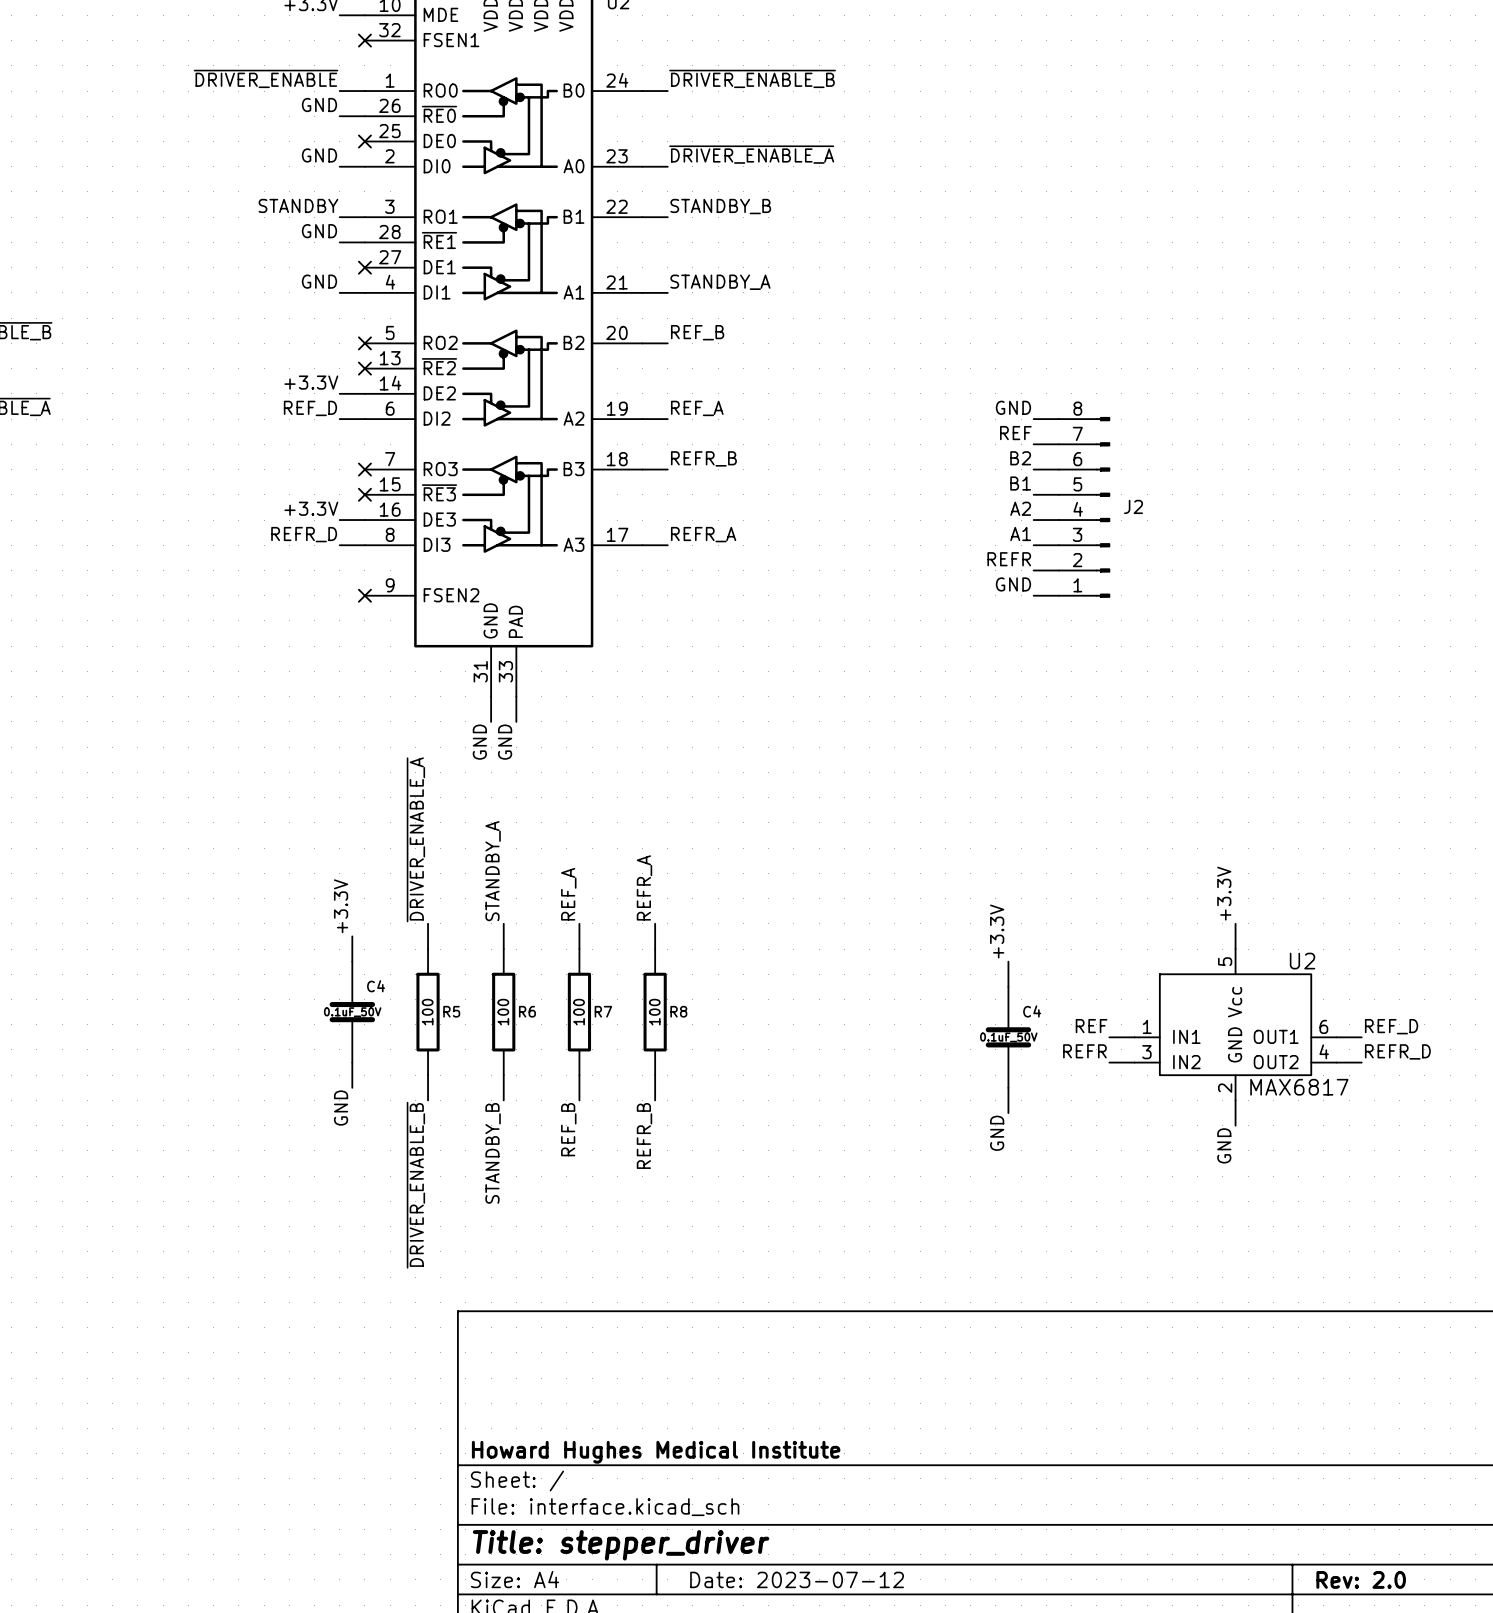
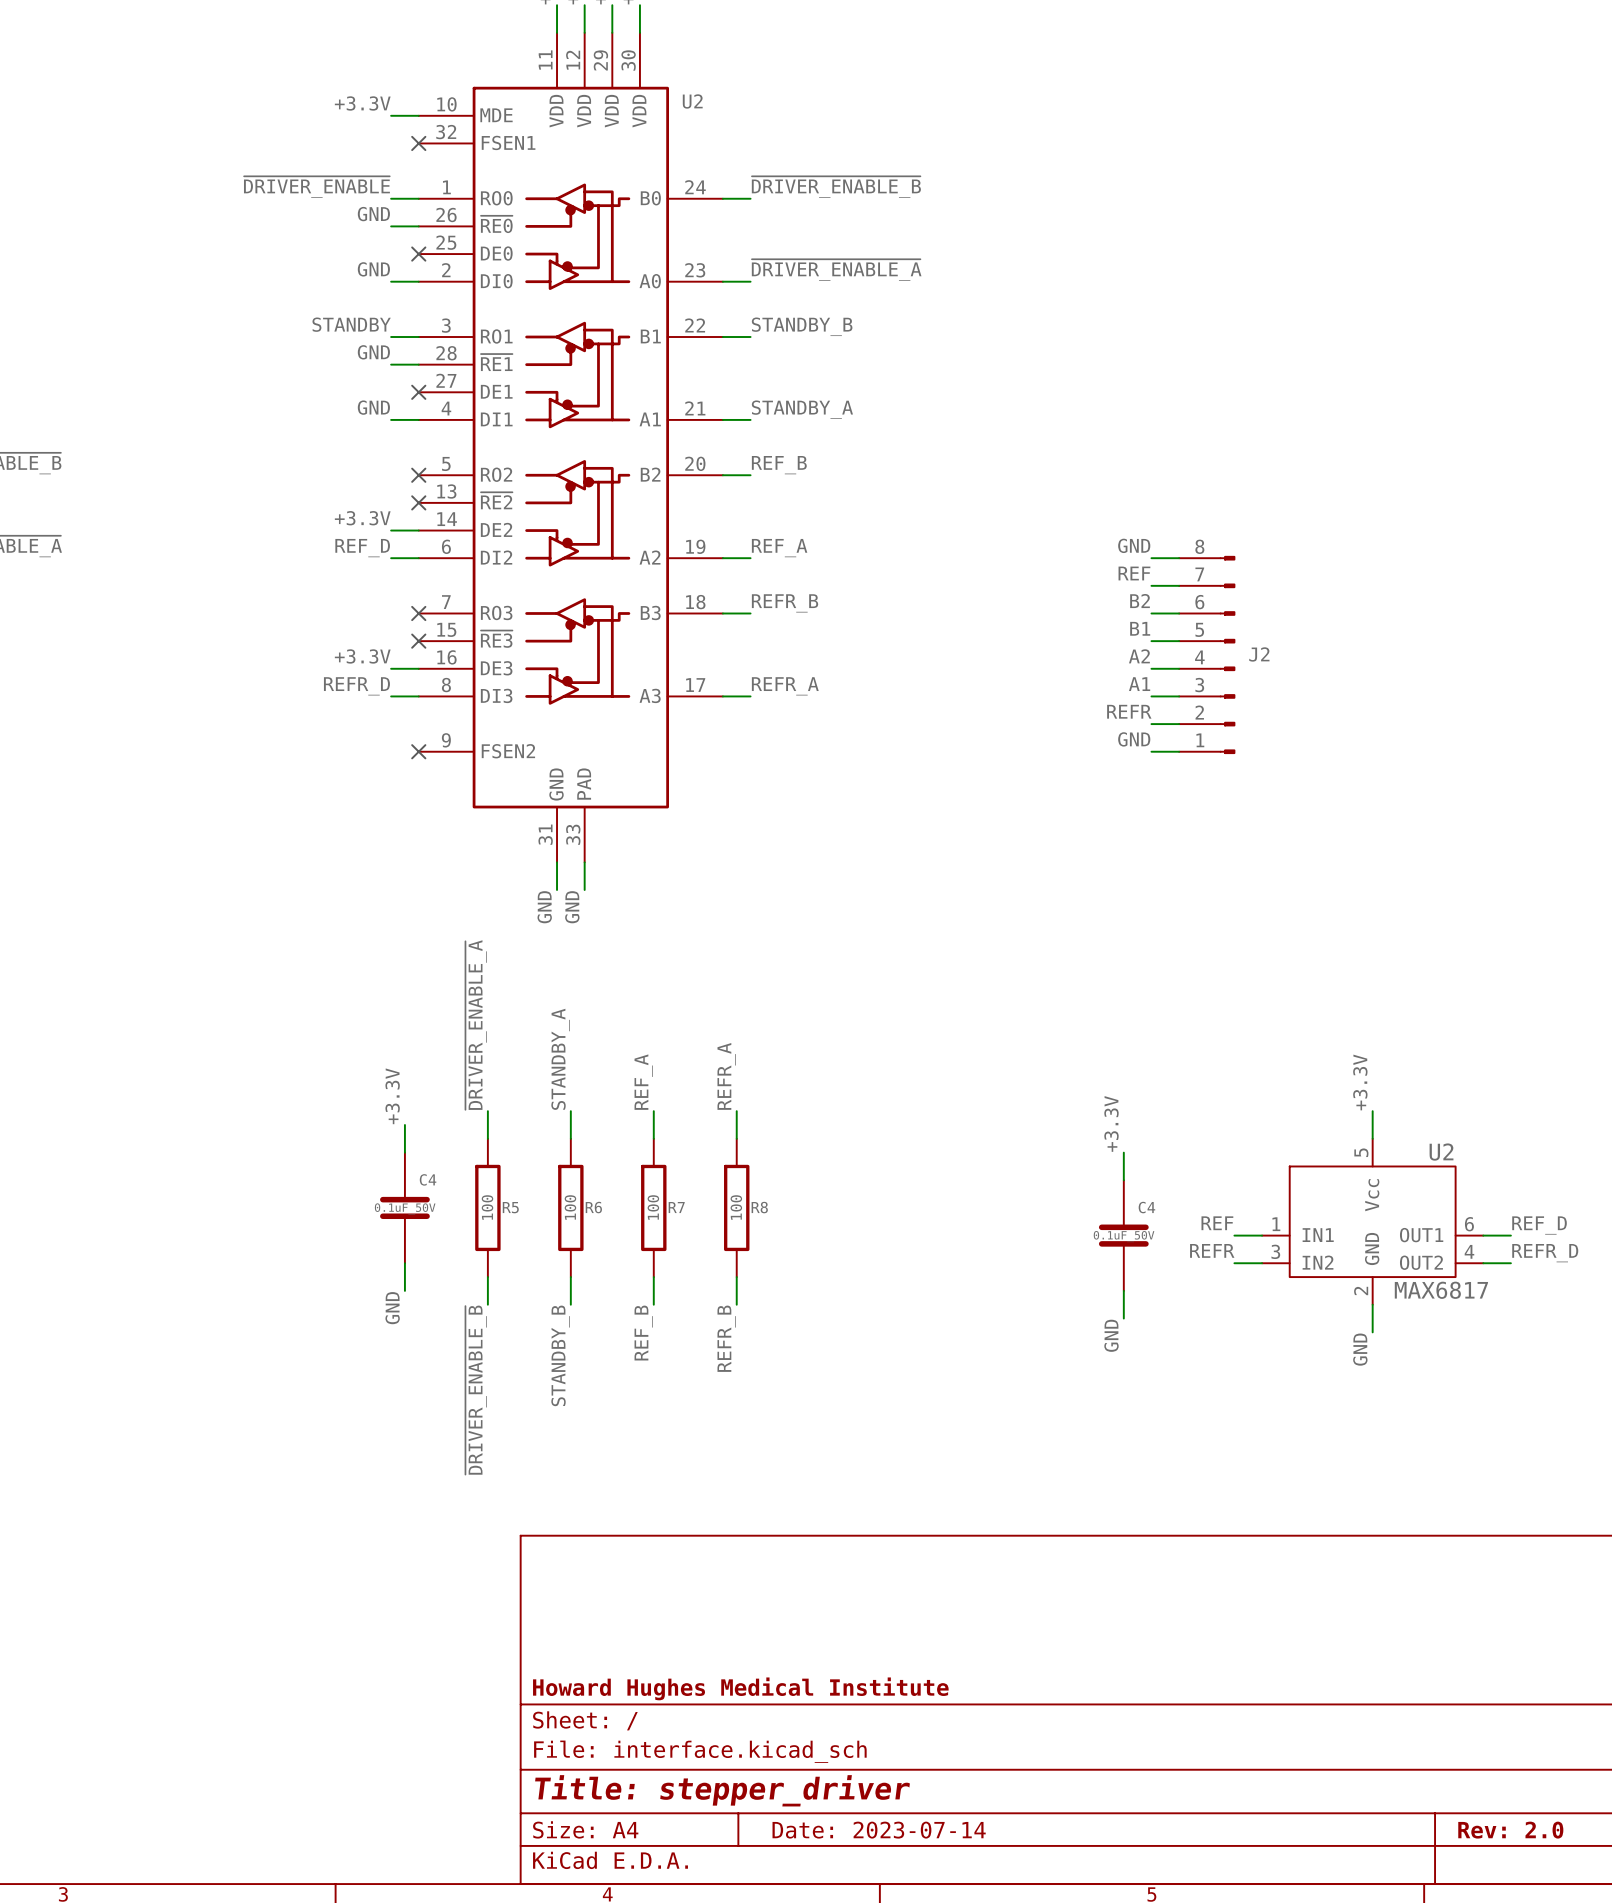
title block: Date: 2023-07-12 (797, 1579) -> Date: 2023-07-14 (879, 1830)

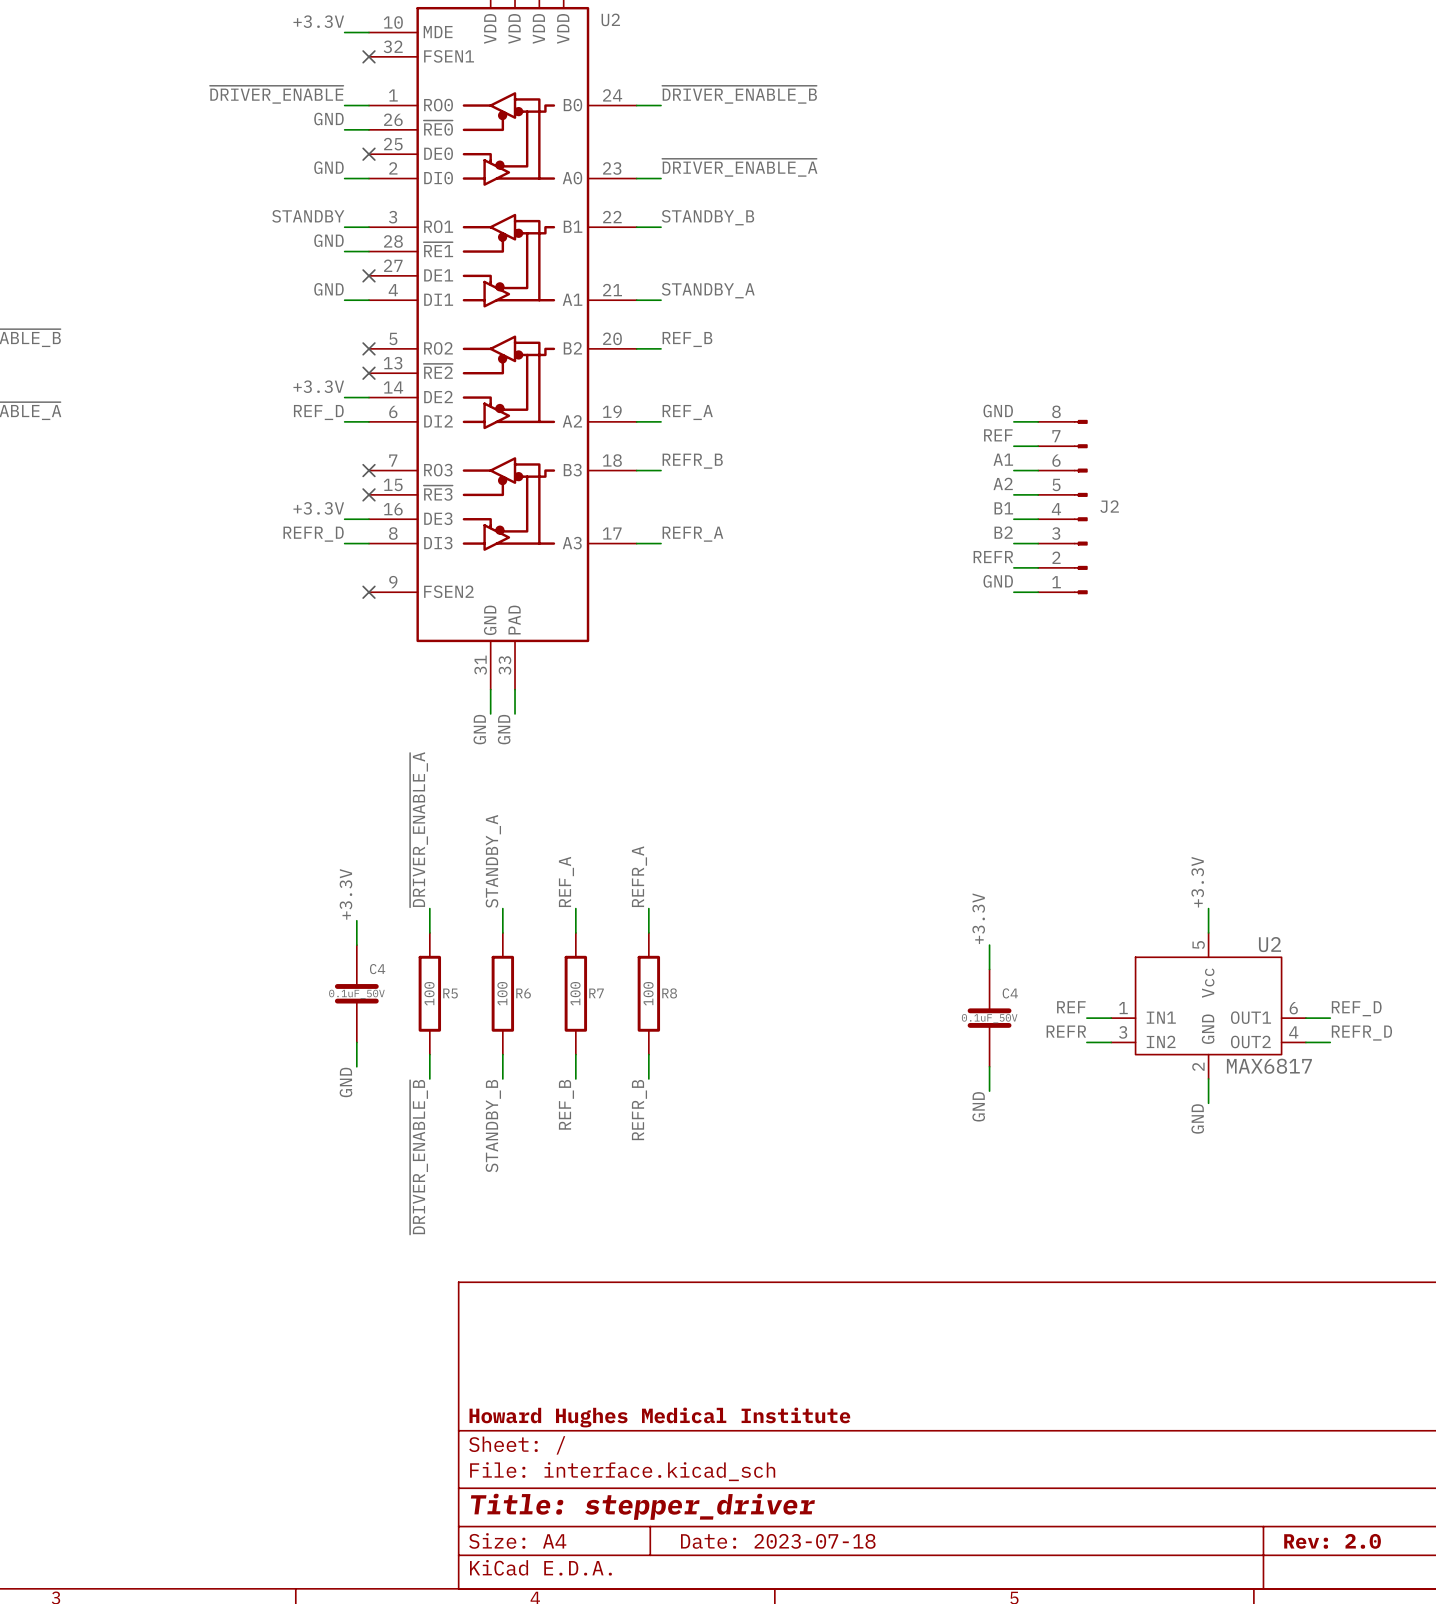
label: B2 (1140, 601) -> A1 (1003, 459)
label: B1 (1140, 628) -> A2 (1003, 483)
label: A2 (1139, 656) -> B1 (1003, 508)
label: A1 (1139, 684) -> B2 (1003, 532)
title block: Date: 2023-07-14 (879, 1830) -> Date: 2023-07-18 (778, 1541)

